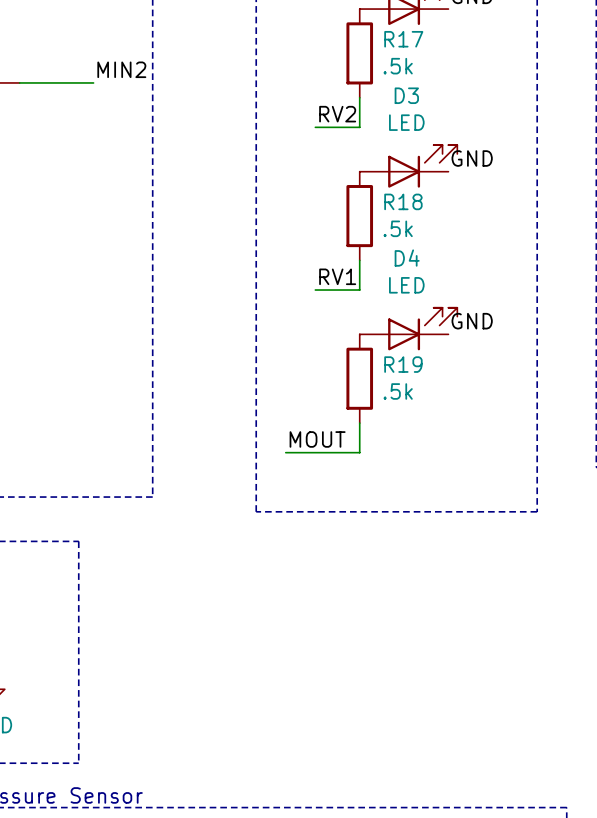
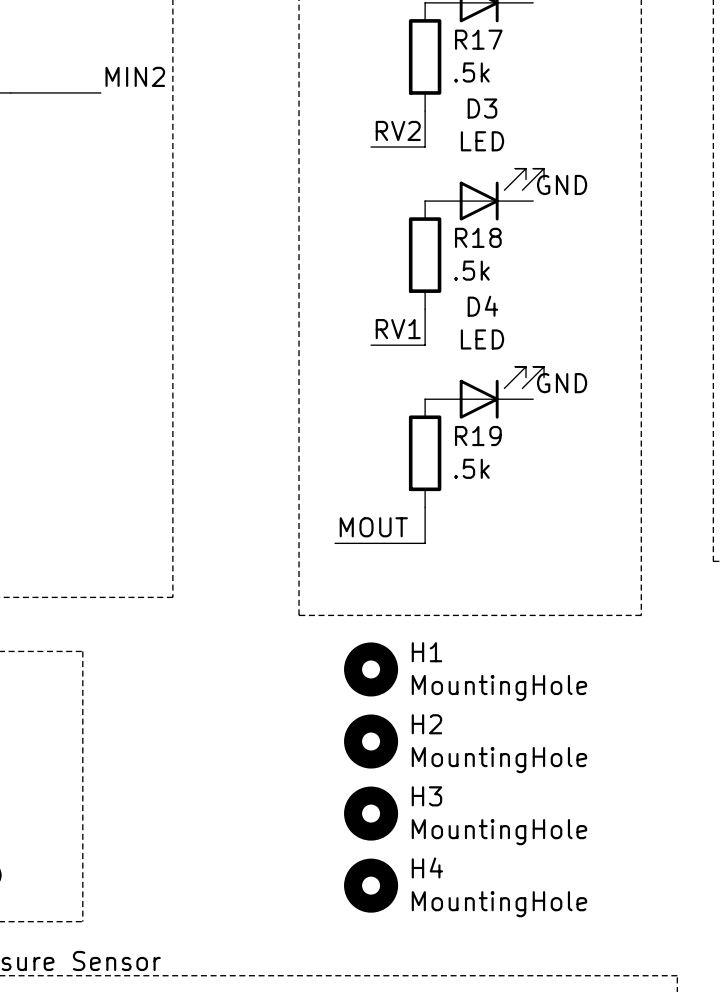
H1: none -> MountingHole (371, 669)
H2: none -> MountingHole (371, 741)
H3: none -> MountingHole (371, 813)
H4: none -> MountingHole (371, 885)

